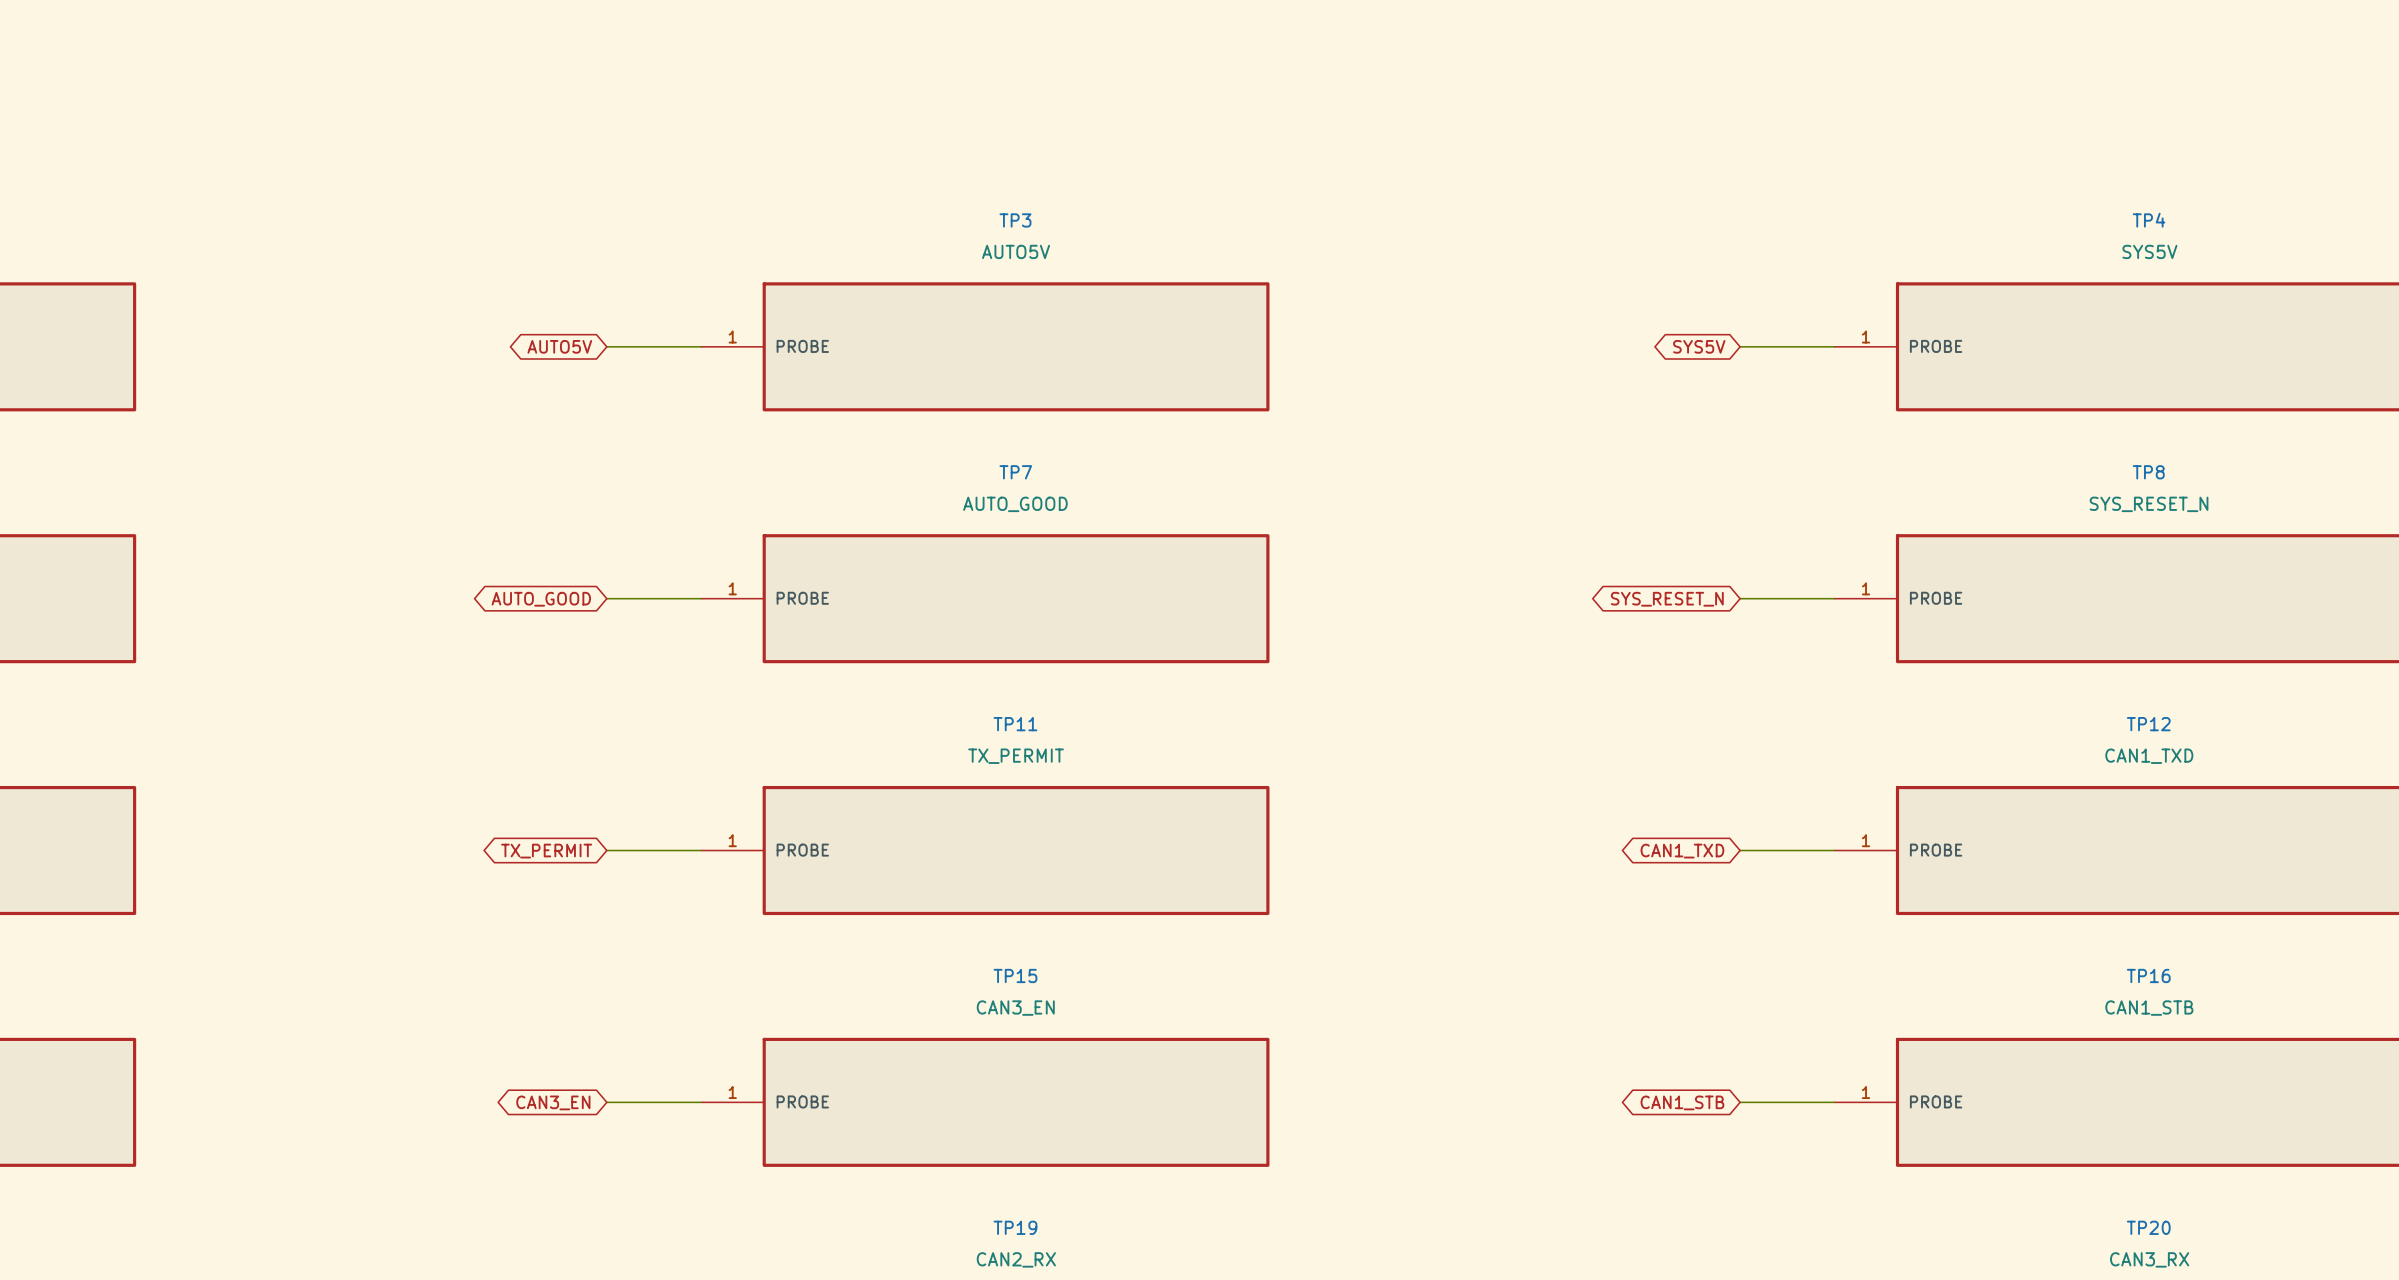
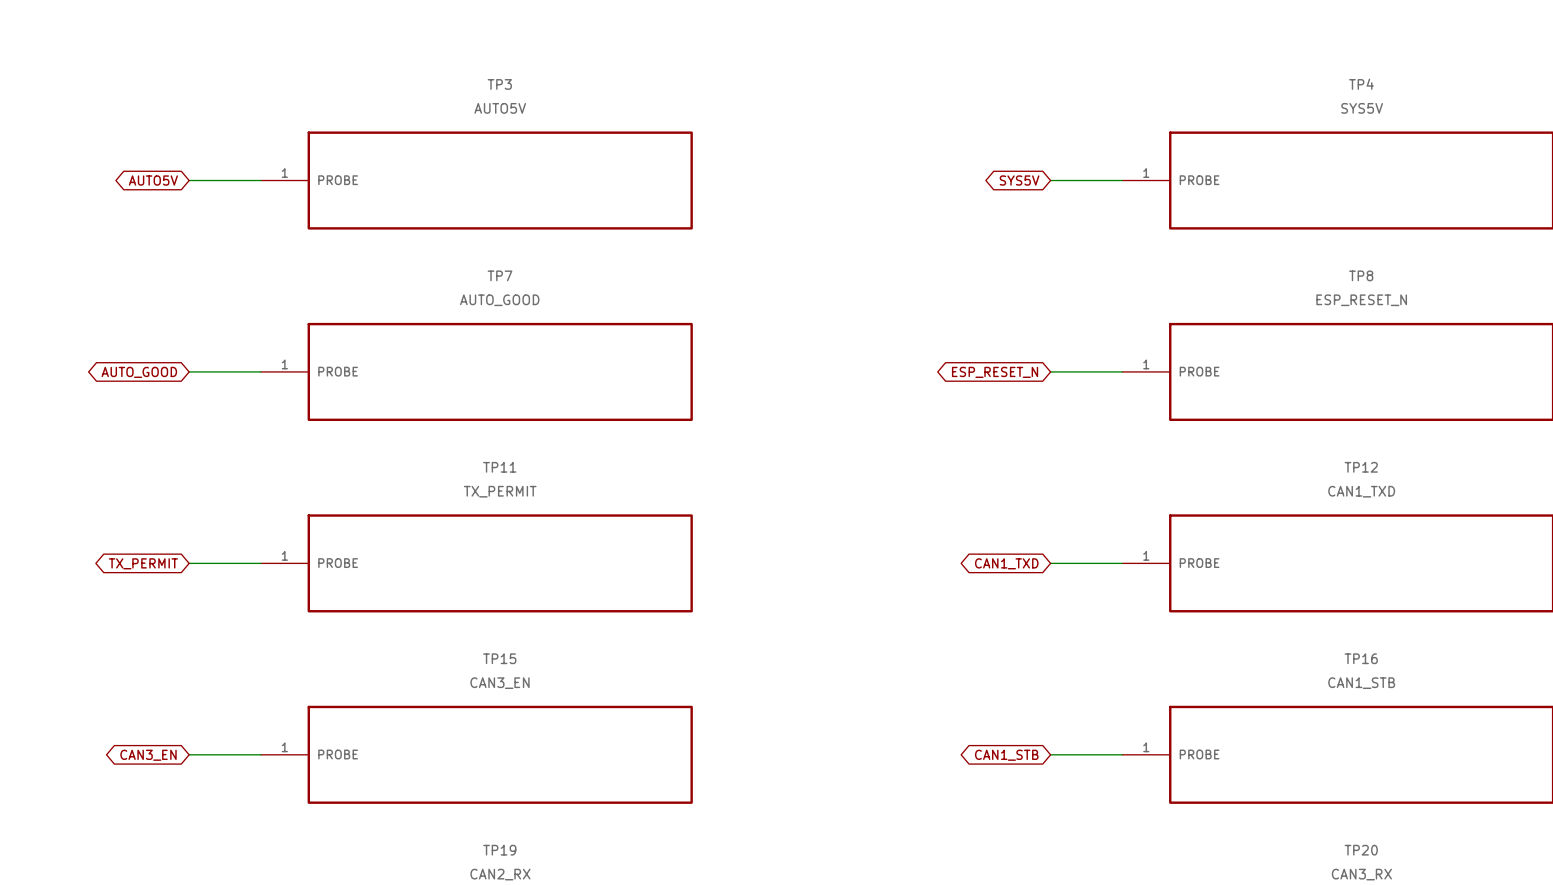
TP8 value: SYS_RESET_N (2149, 504) -> ESP_RESET_N (1361, 300)
global label: SYS_RESET_N (1667, 599) -> ESP_RESET_N (995, 372)

